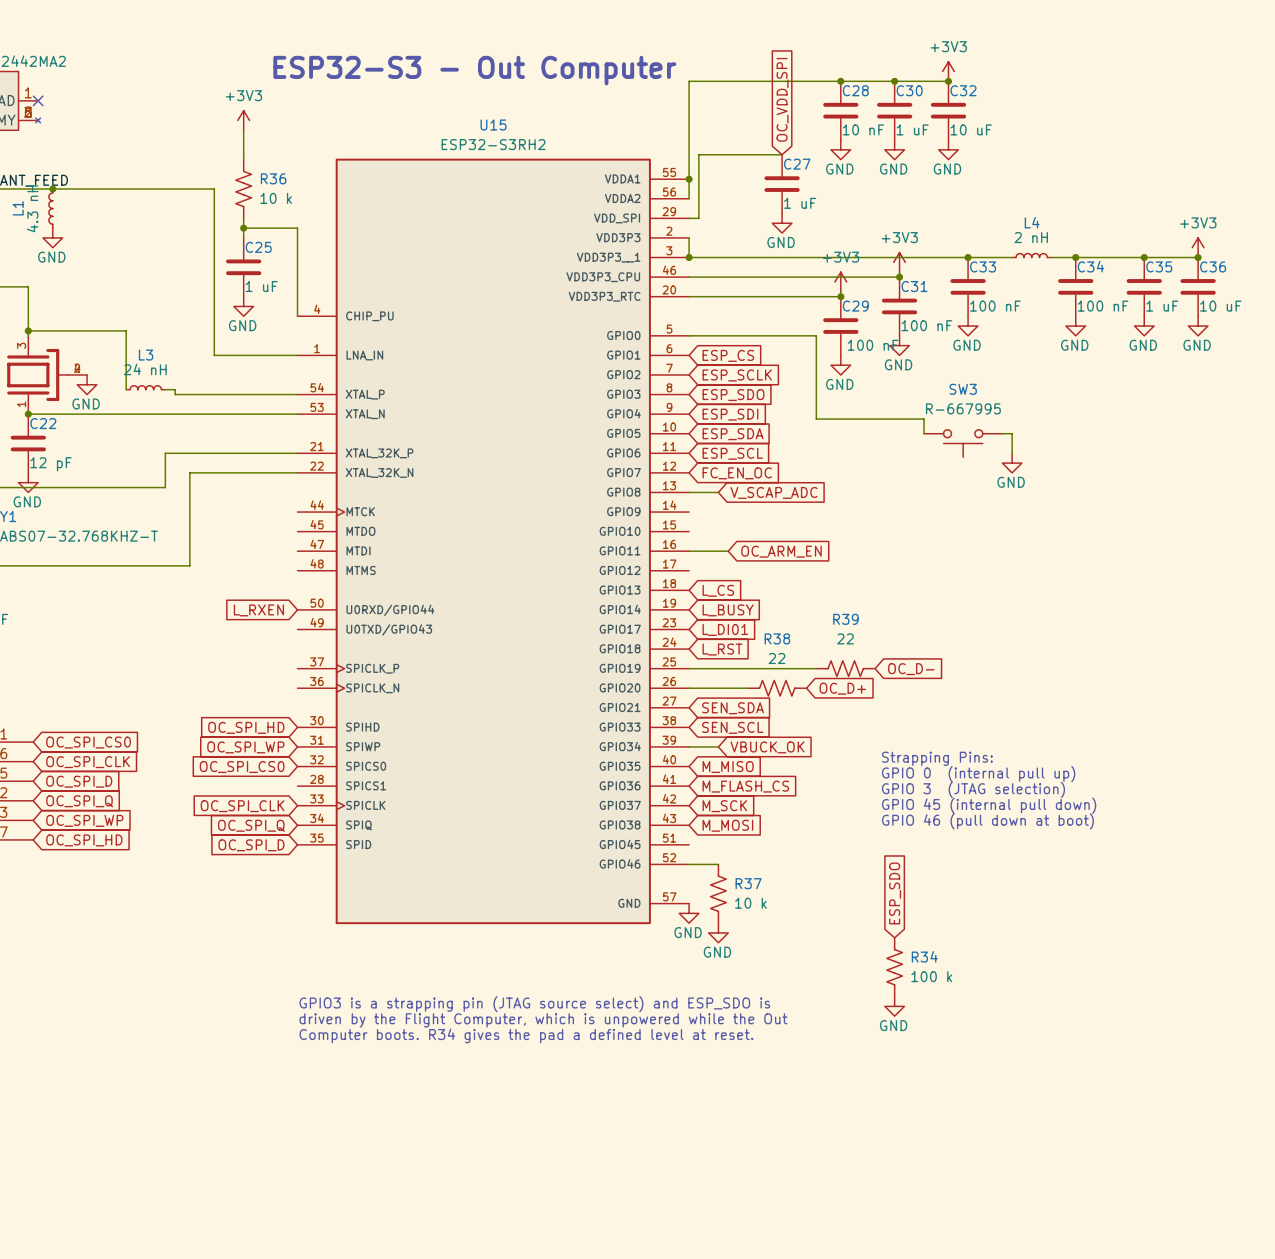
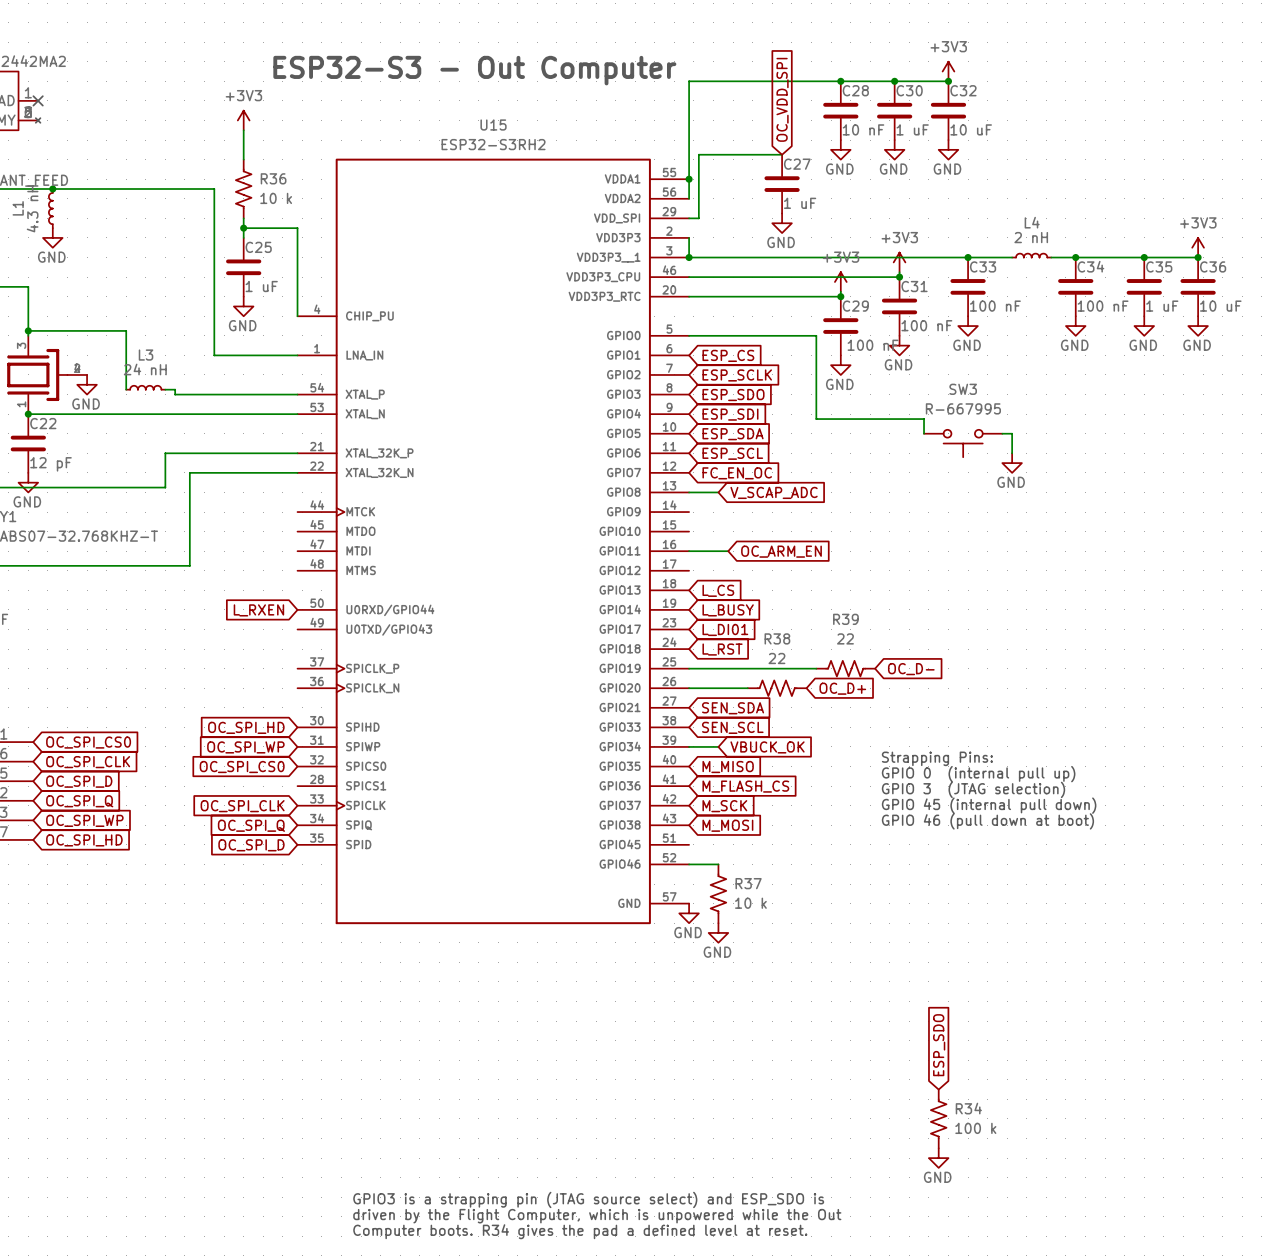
global label position: ESP_SDO (895, 893) -> ESP_SDO (939, 1045)
R34 position: (894, 967) -> (938, 1118)
text: GPIO3 is a strapping pin (JTAG source select) and ESP_SDO is (534, 1004) -> none
power symbol position: GND (894, 1006) -> GND (938, 1158)
text: driven by the Flight Computer, which is unpowered while the Out (543, 1020) -> none
text: Computer boots. R34 gives the pad a defined level at reset. (526, 1035) -> none
text: none -> GPIO3 is a strapping pin (JTAG source select) and ESP_SDO is (588, 1199)
text: none -> driven by the Flight Computer, which is unpowered while the Out (597, 1216)
text: none -> Computer boots. R34 gives the pad a defined level at reset. (580, 1231)

